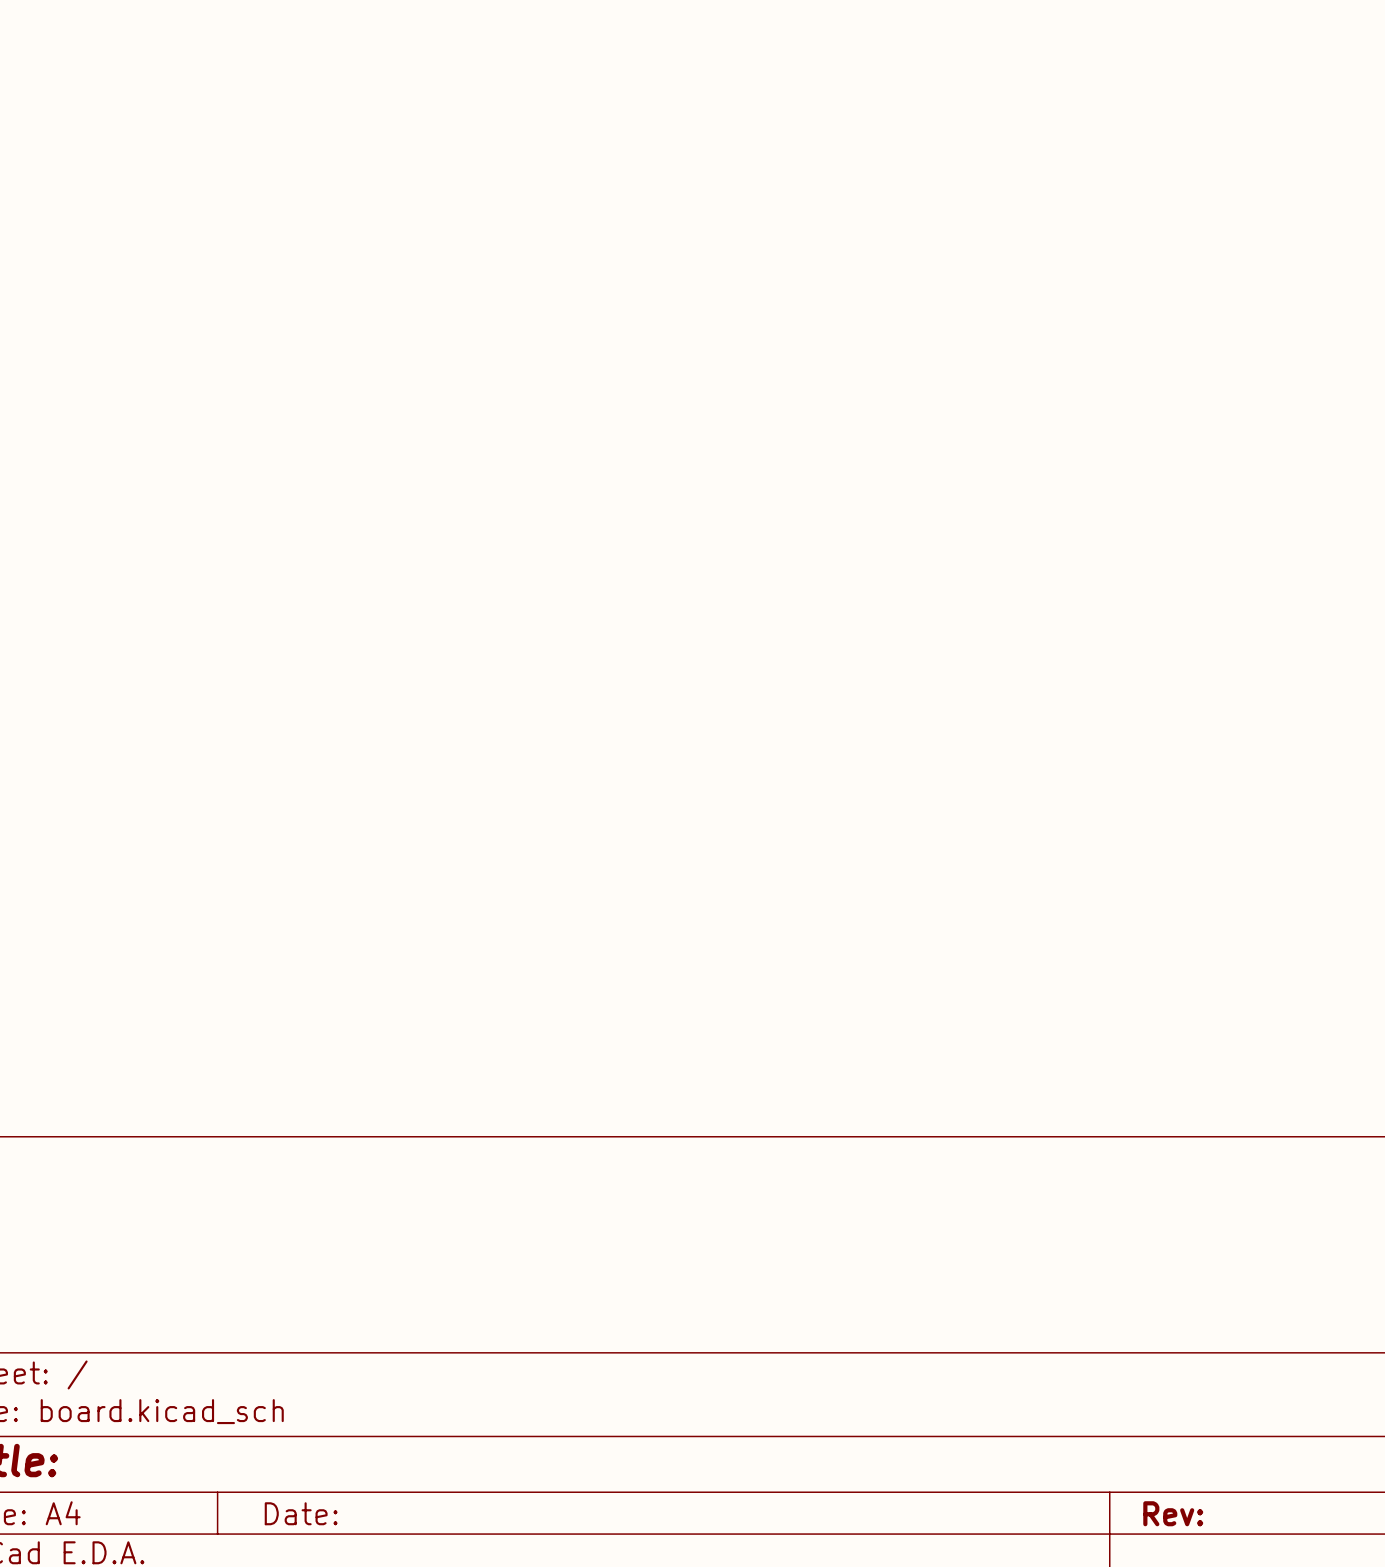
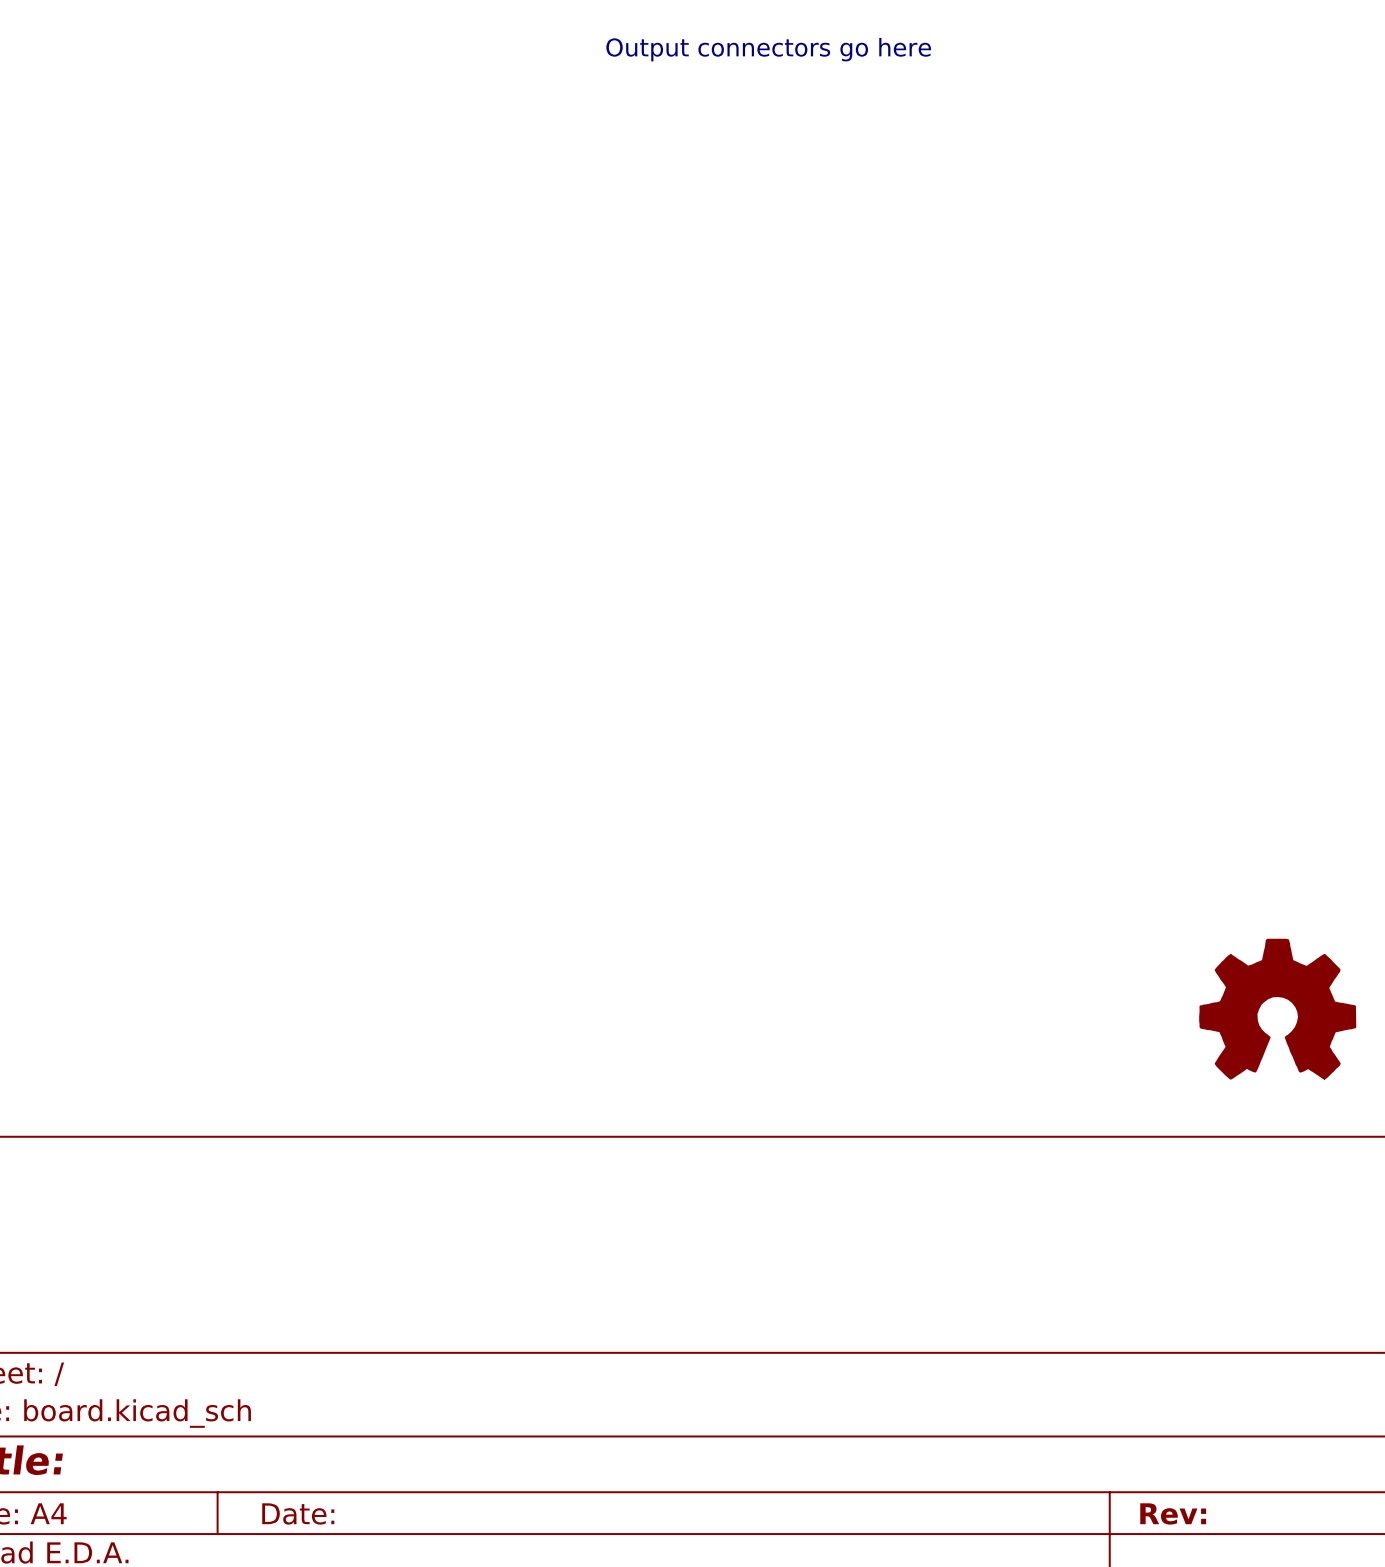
text: none -> Output connectors go here (768, 49)
part: none -> (1277, 1009)

